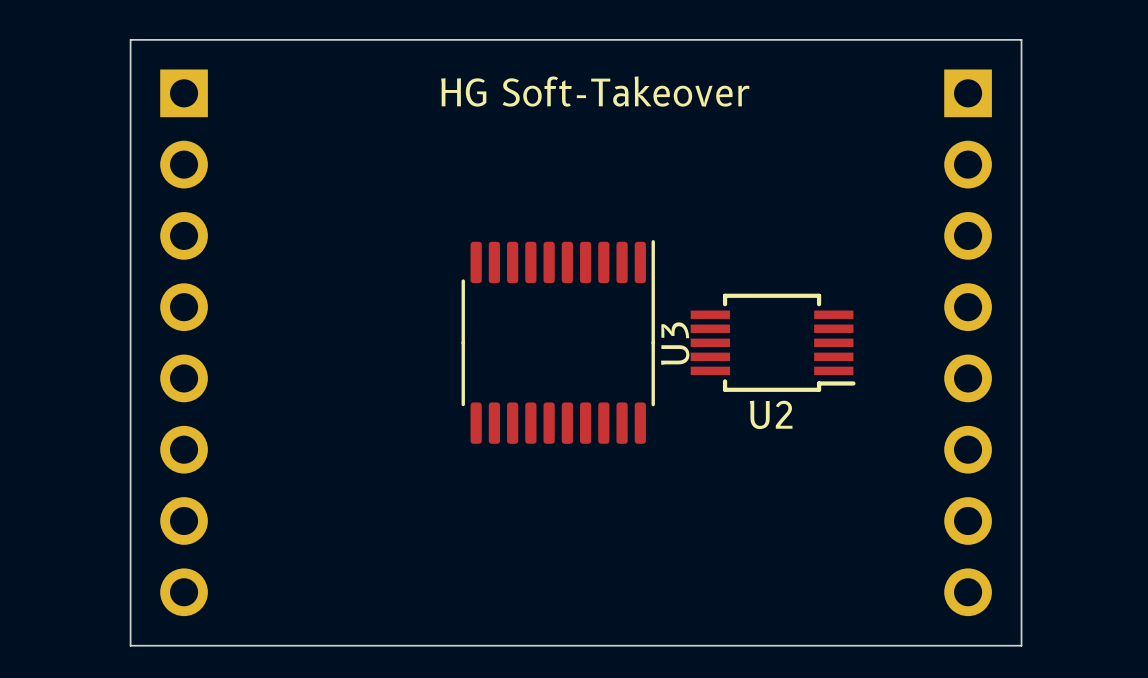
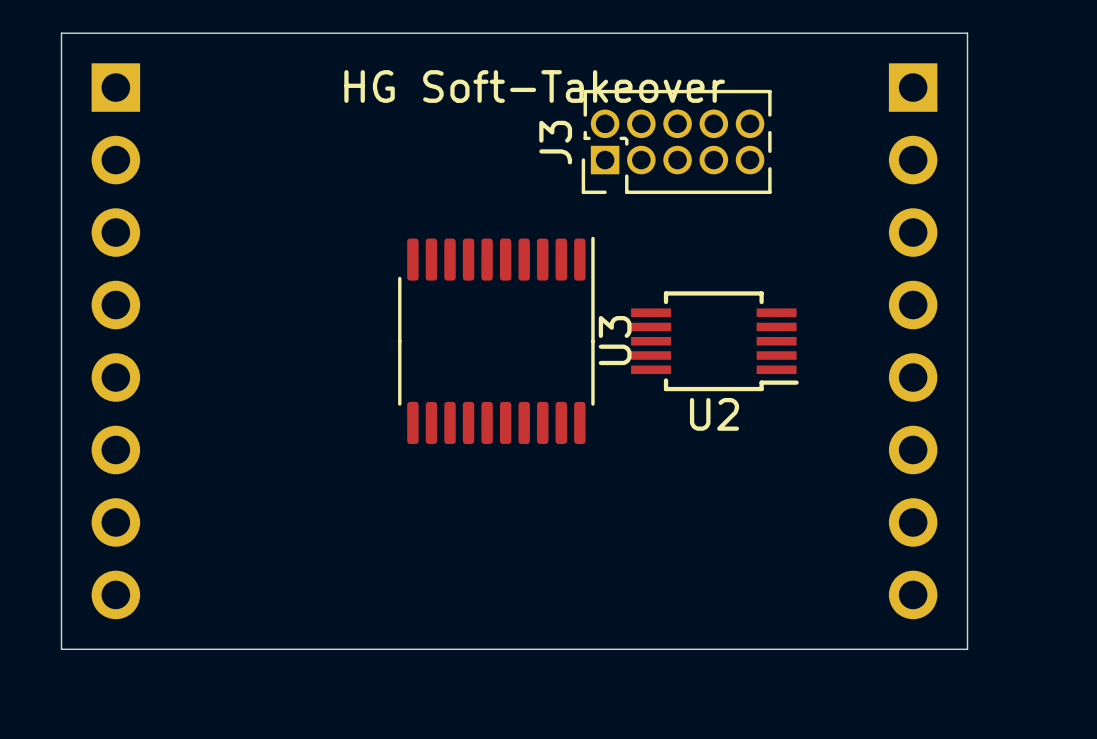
J3: none -> (676, 141)

